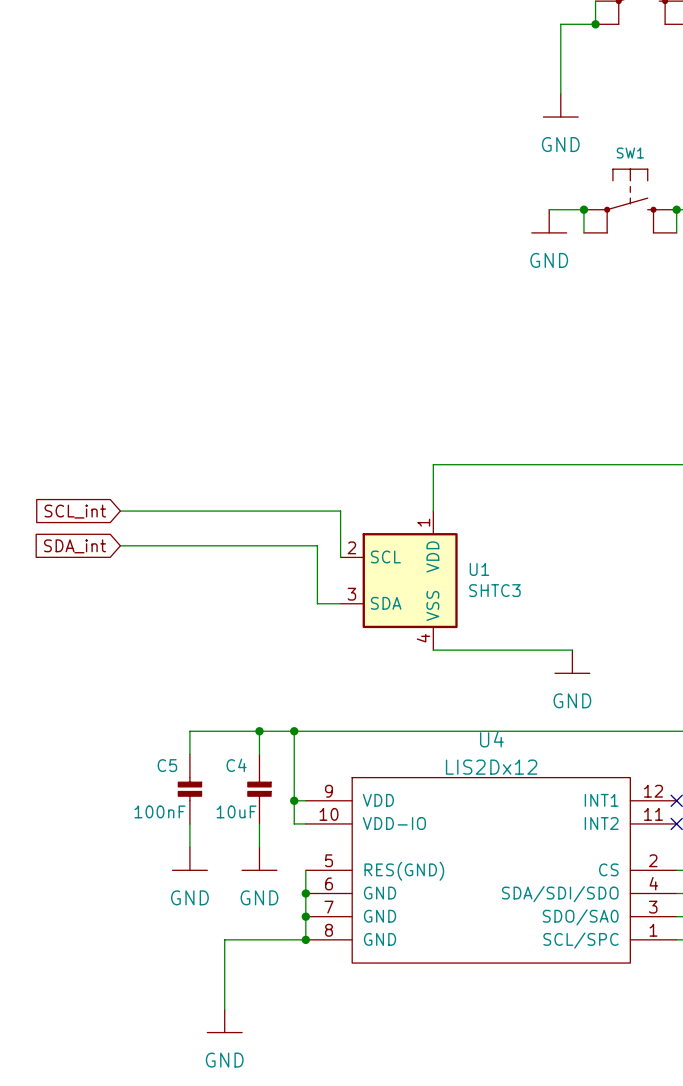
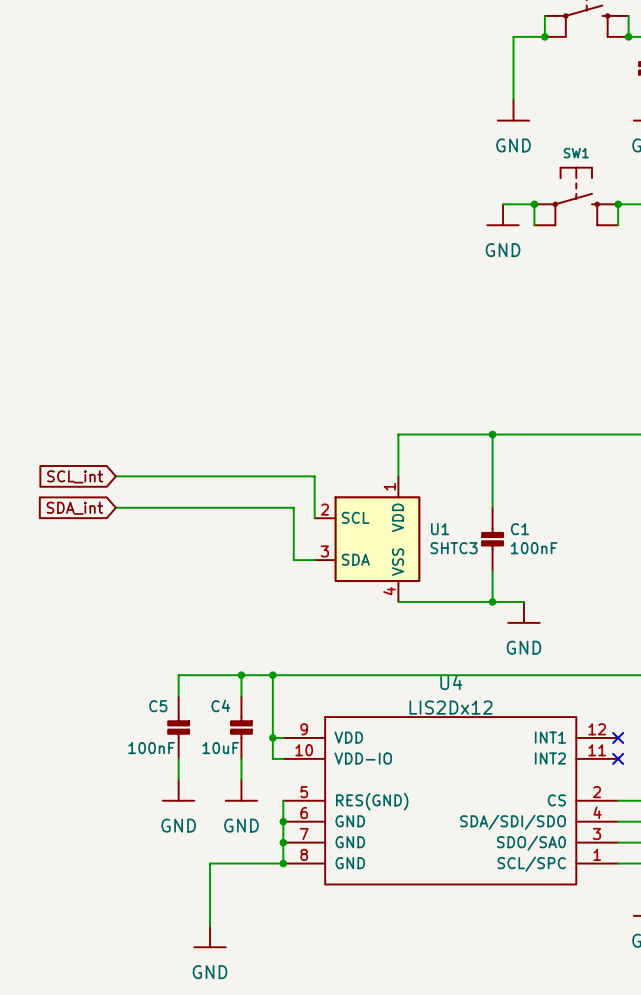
wire: none -> (492, 434) (492, 507)
junction: none -> (492, 434)
C1: none -> 100nF (492, 539)
wire: none -> (492, 570) (492, 601)
junction: none -> (492, 601)

